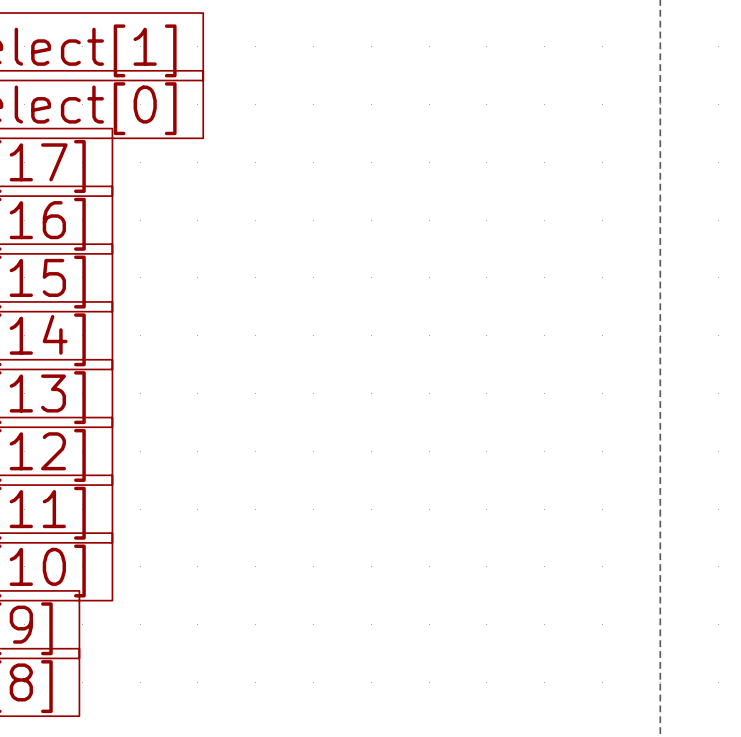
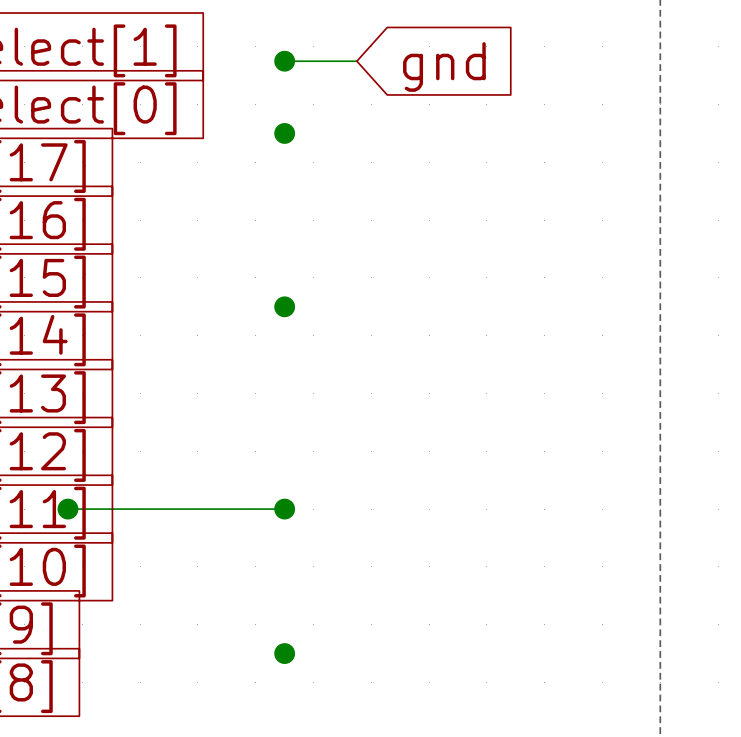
wire: none -> (284, 61) (356, 61)
junction: none -> (284, 61)
global label: none -> gnd (444, 66)
junction: none -> (284, 133)
junction: none -> (284, 306)
wire: none -> (67, 509) (284, 509)
junction: none -> (67, 509)
junction: none -> (284, 509)
junction: none -> (284, 653)

